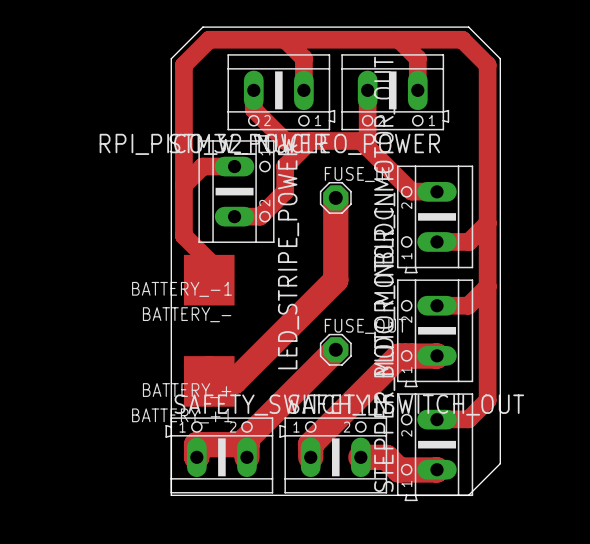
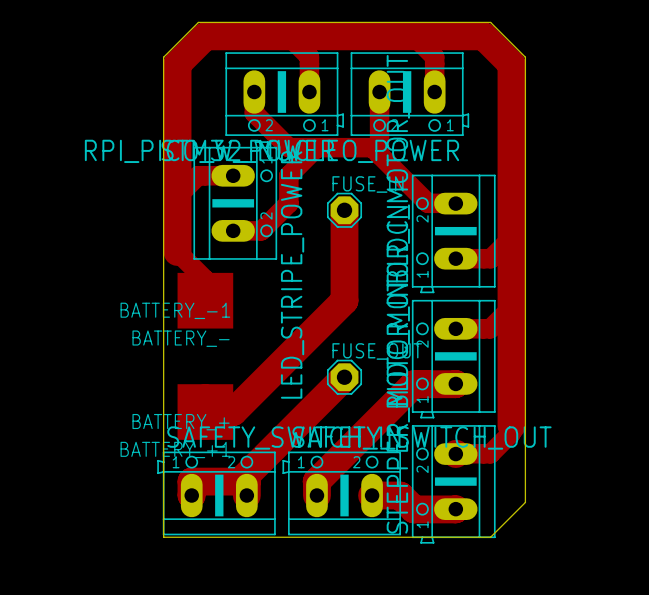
track width: thin (183, 235) (183, 65) (209, 39) (462, 39) (487, 65) (487, 394) -> thick (177, 252) (177, 64) (205, 36) (483, 36) (511, 64) (511, 425)

